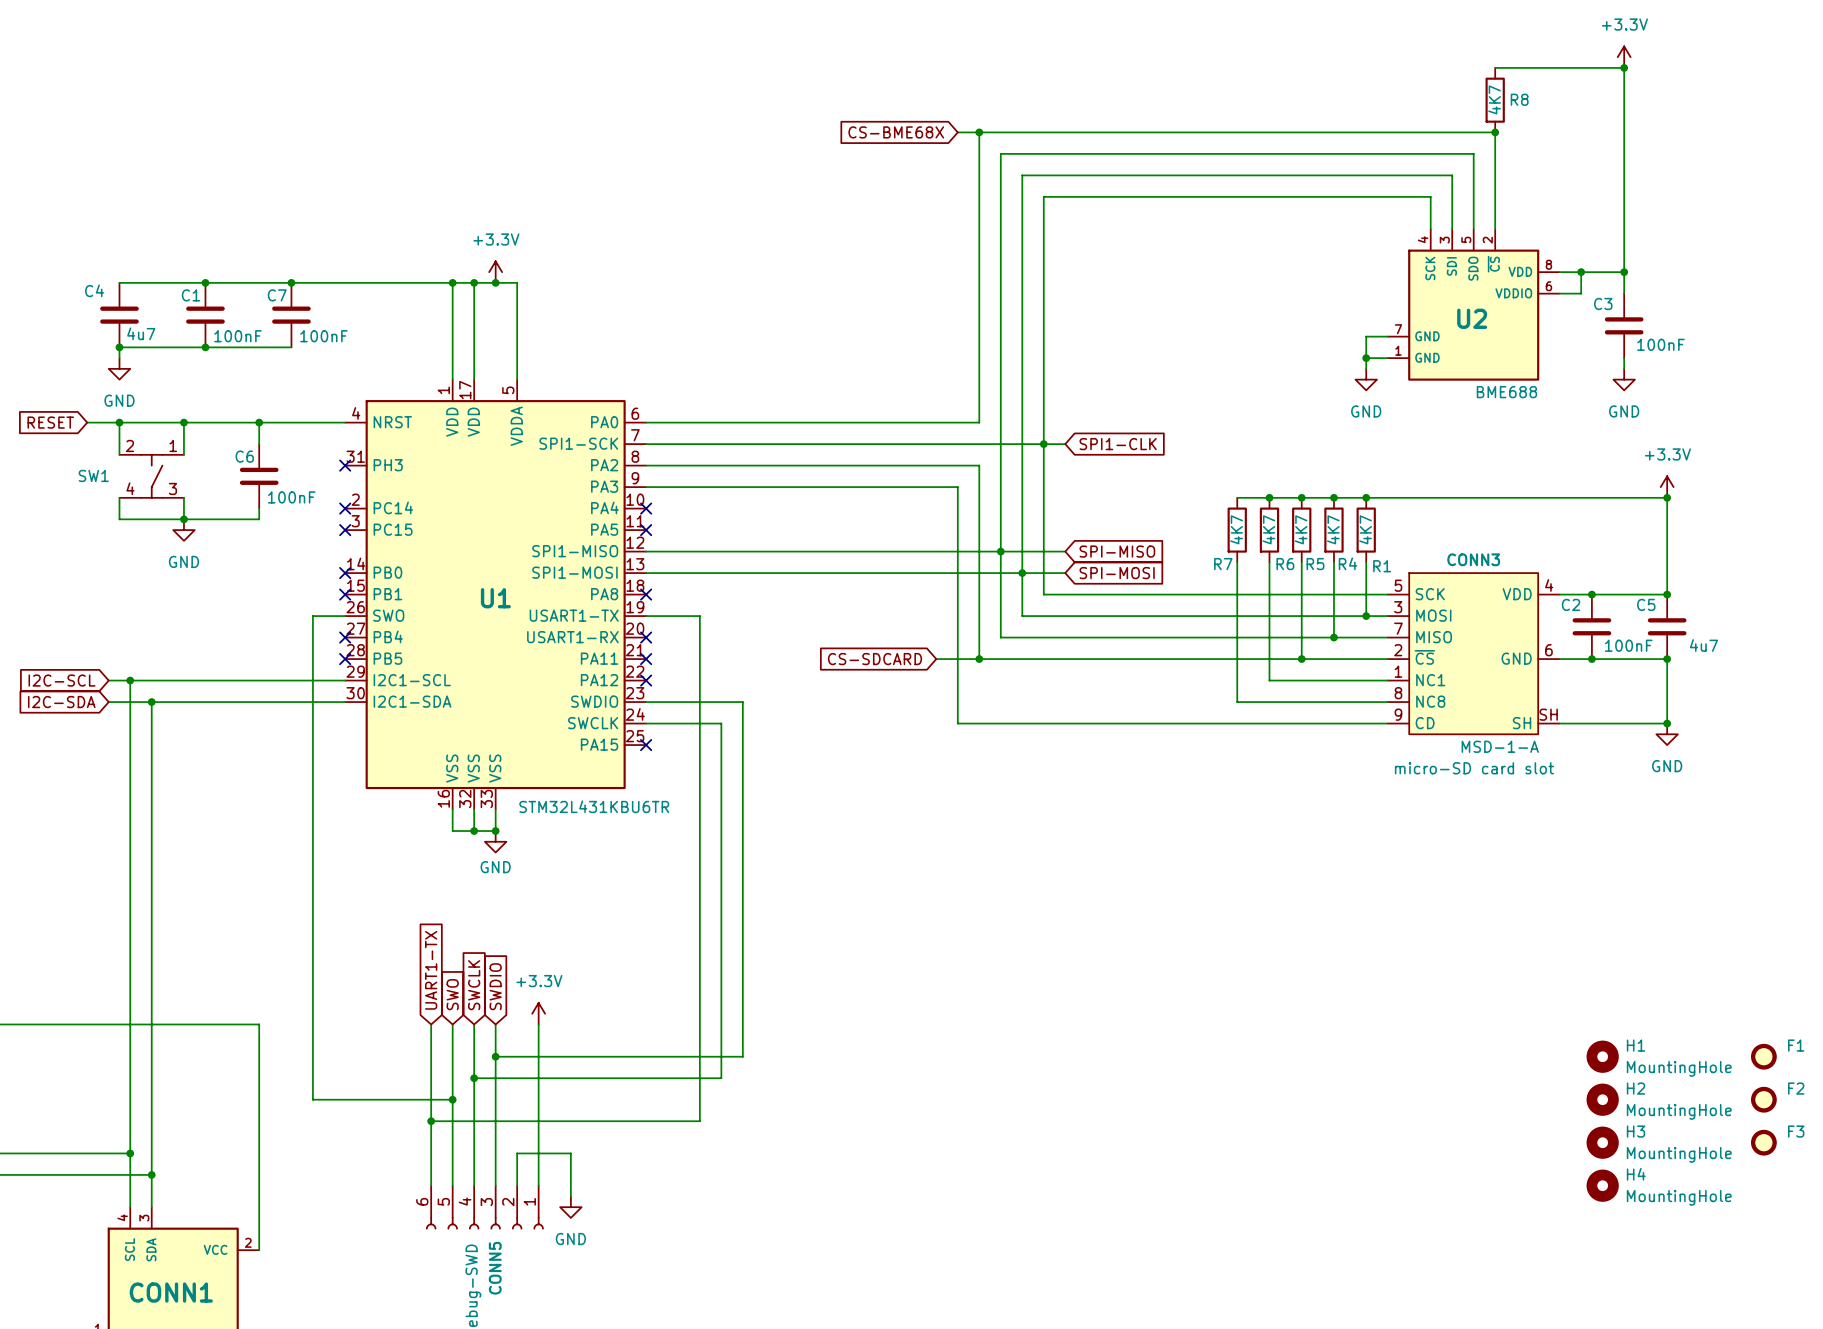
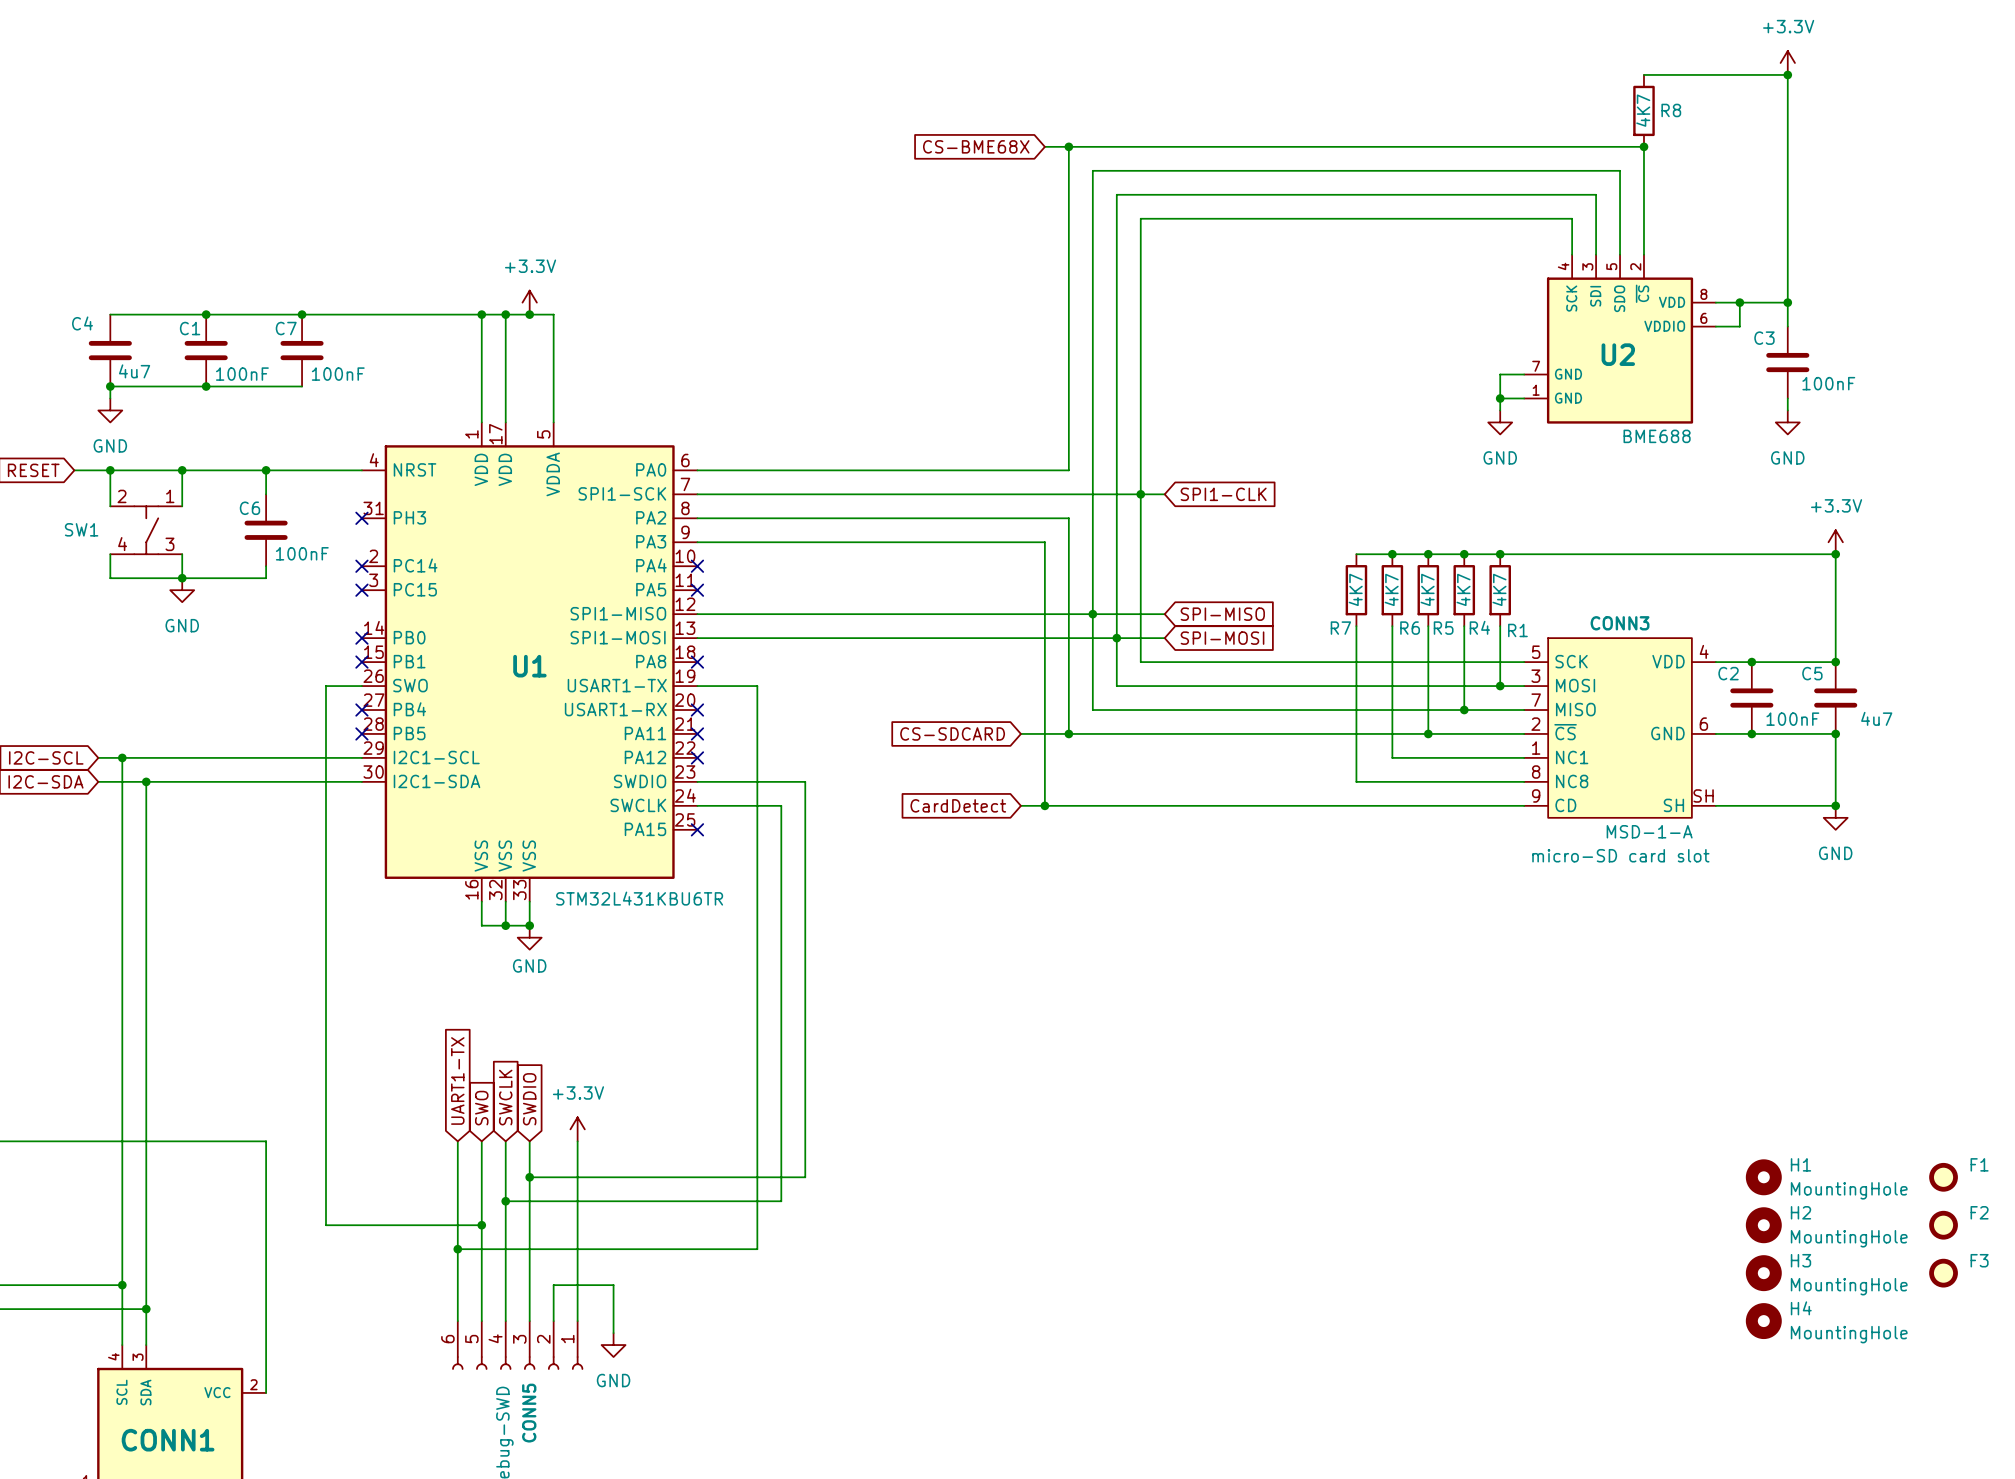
global label: none -> CardDetect (958, 805)
wire: none -> (1020, 805) (1044, 805)
junction: none -> (1044, 805)

